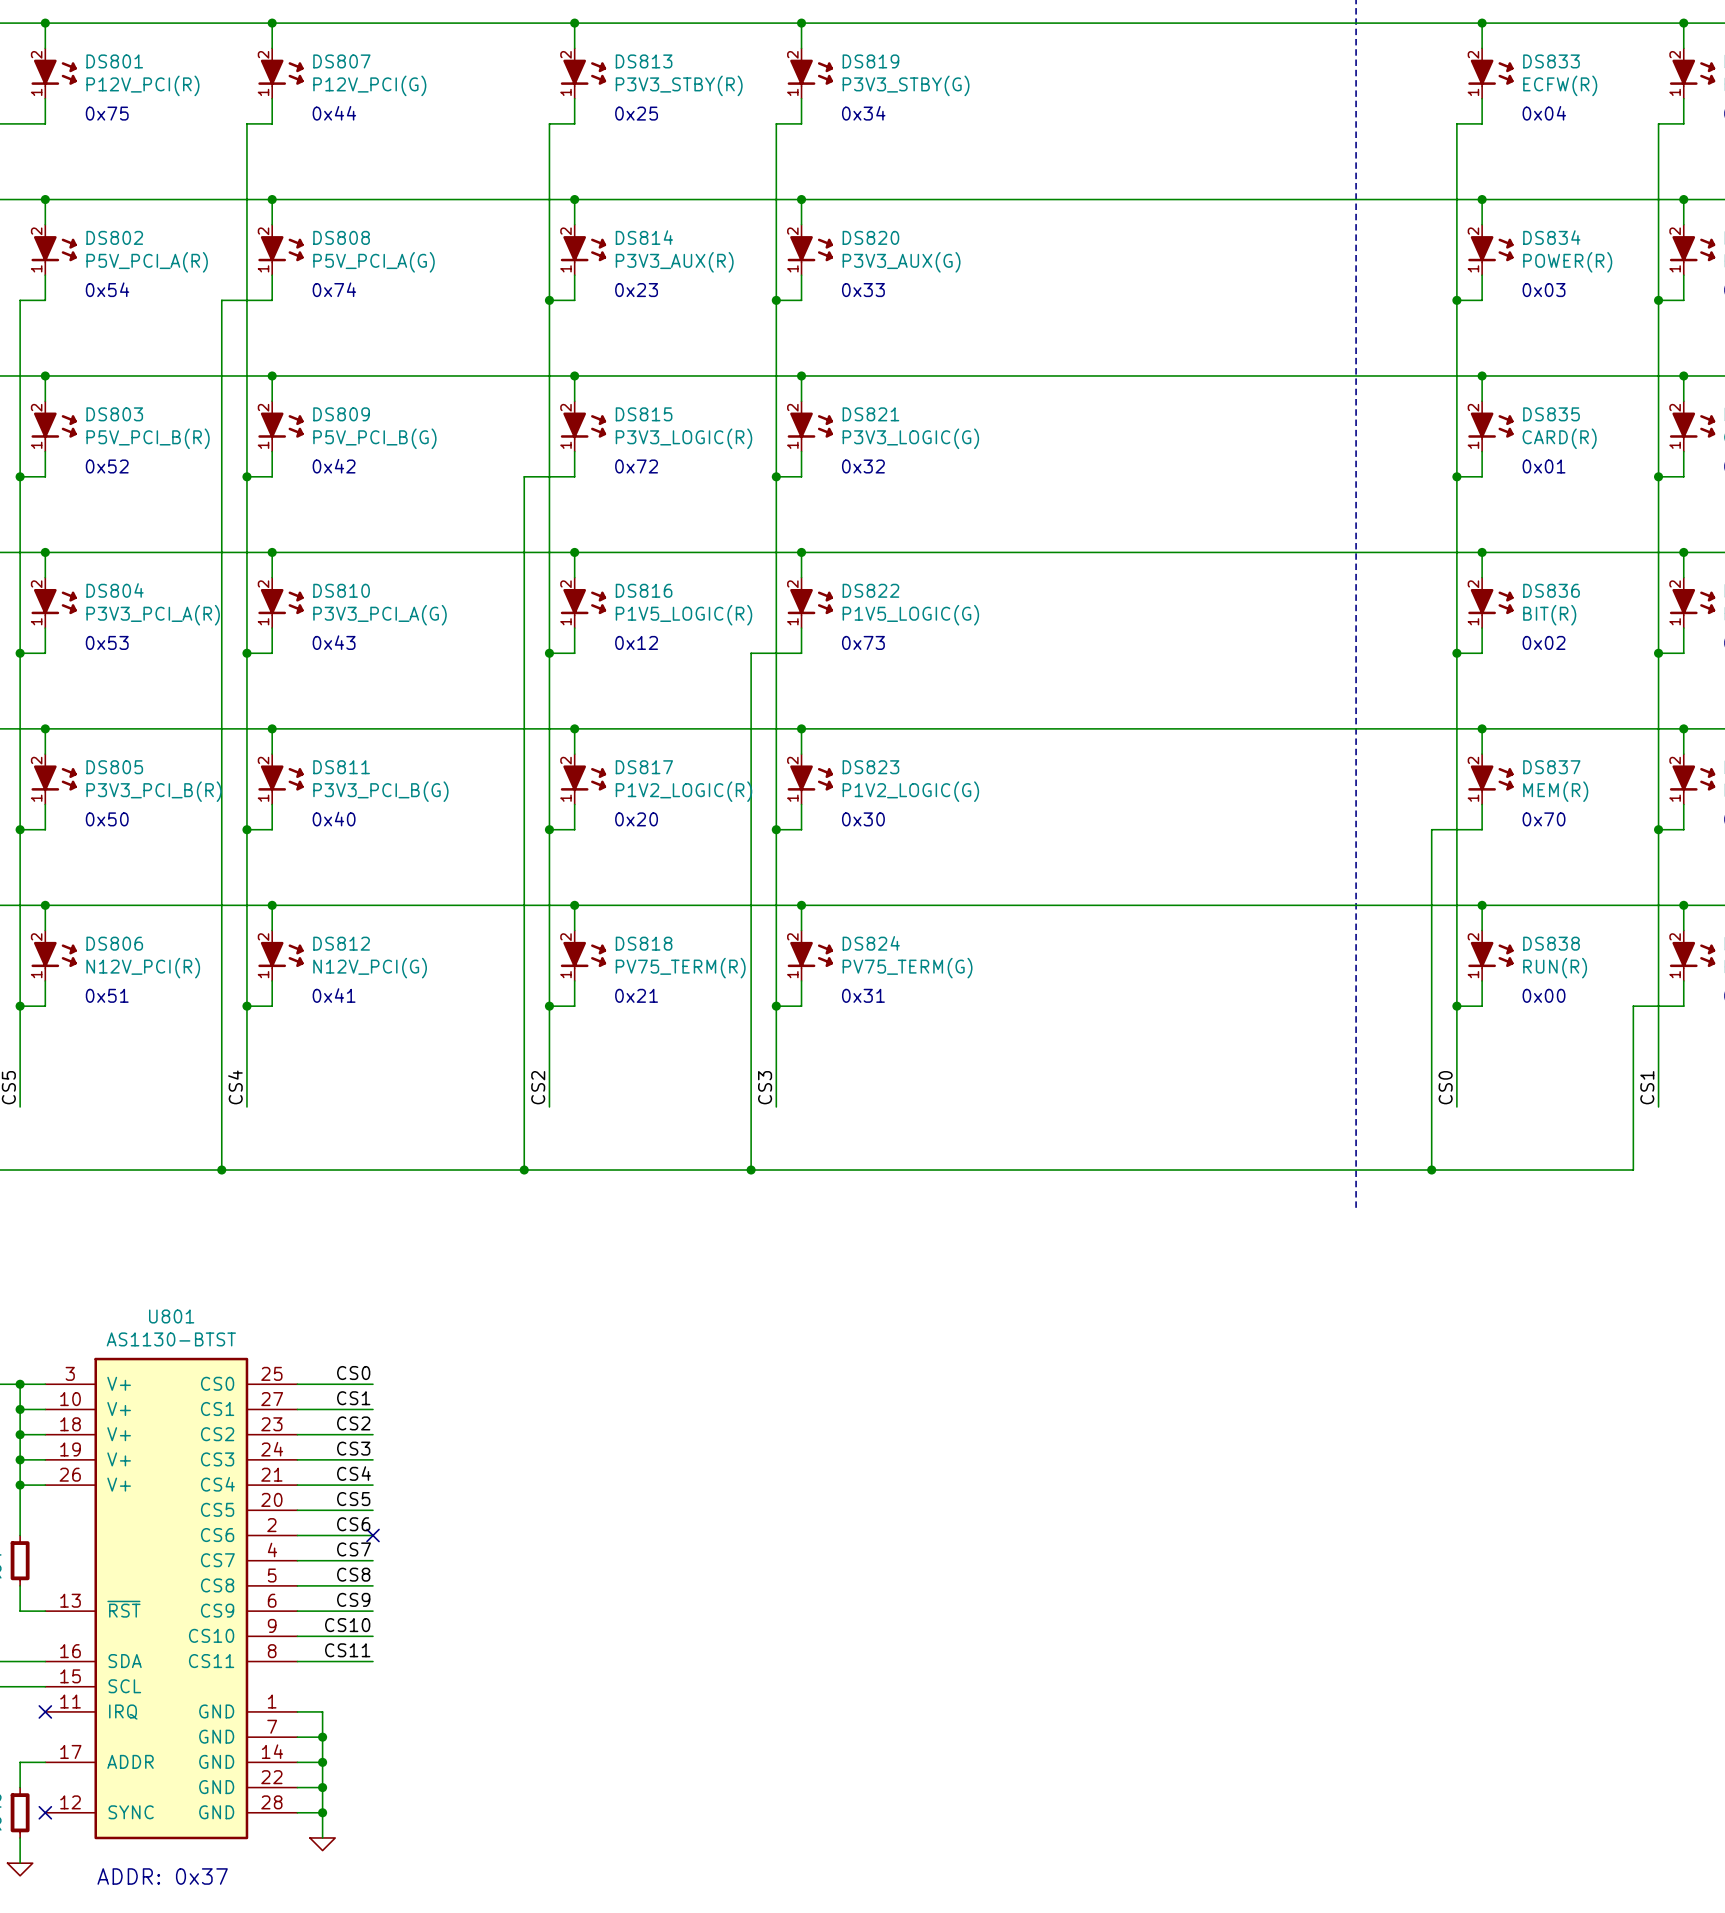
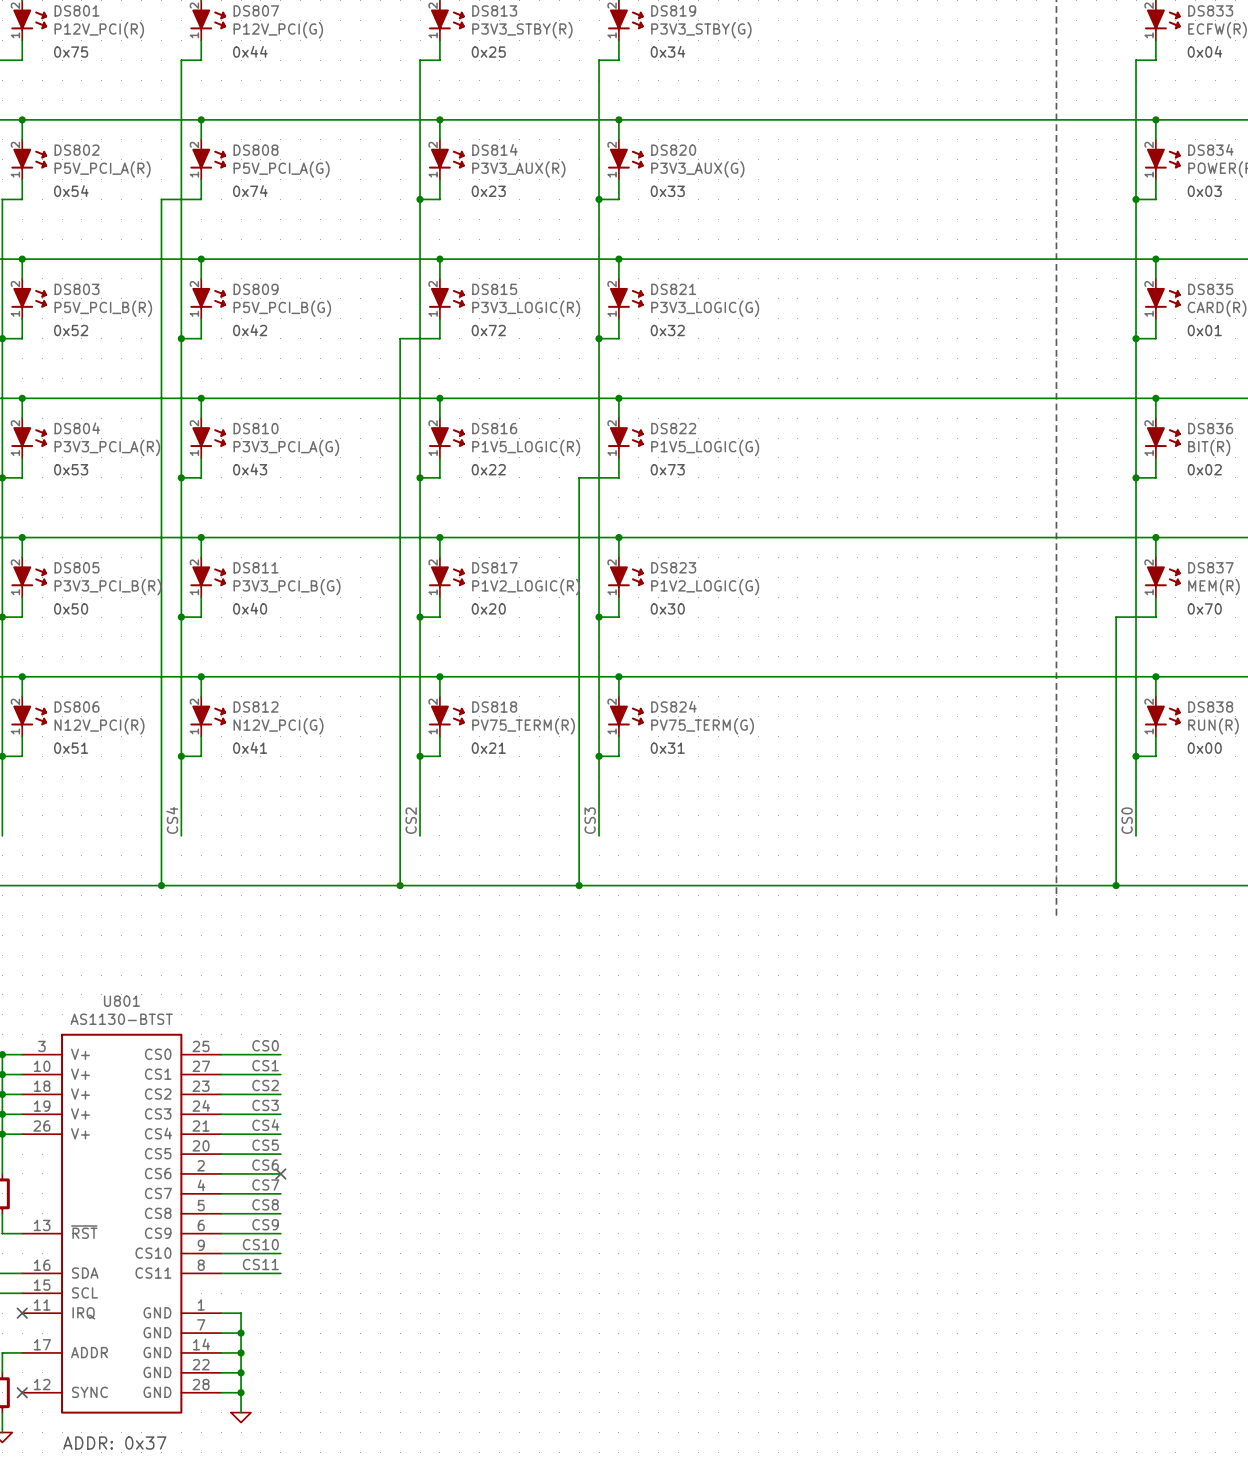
text: 0x12 (636, 642) -> 0x22 (488, 469)

